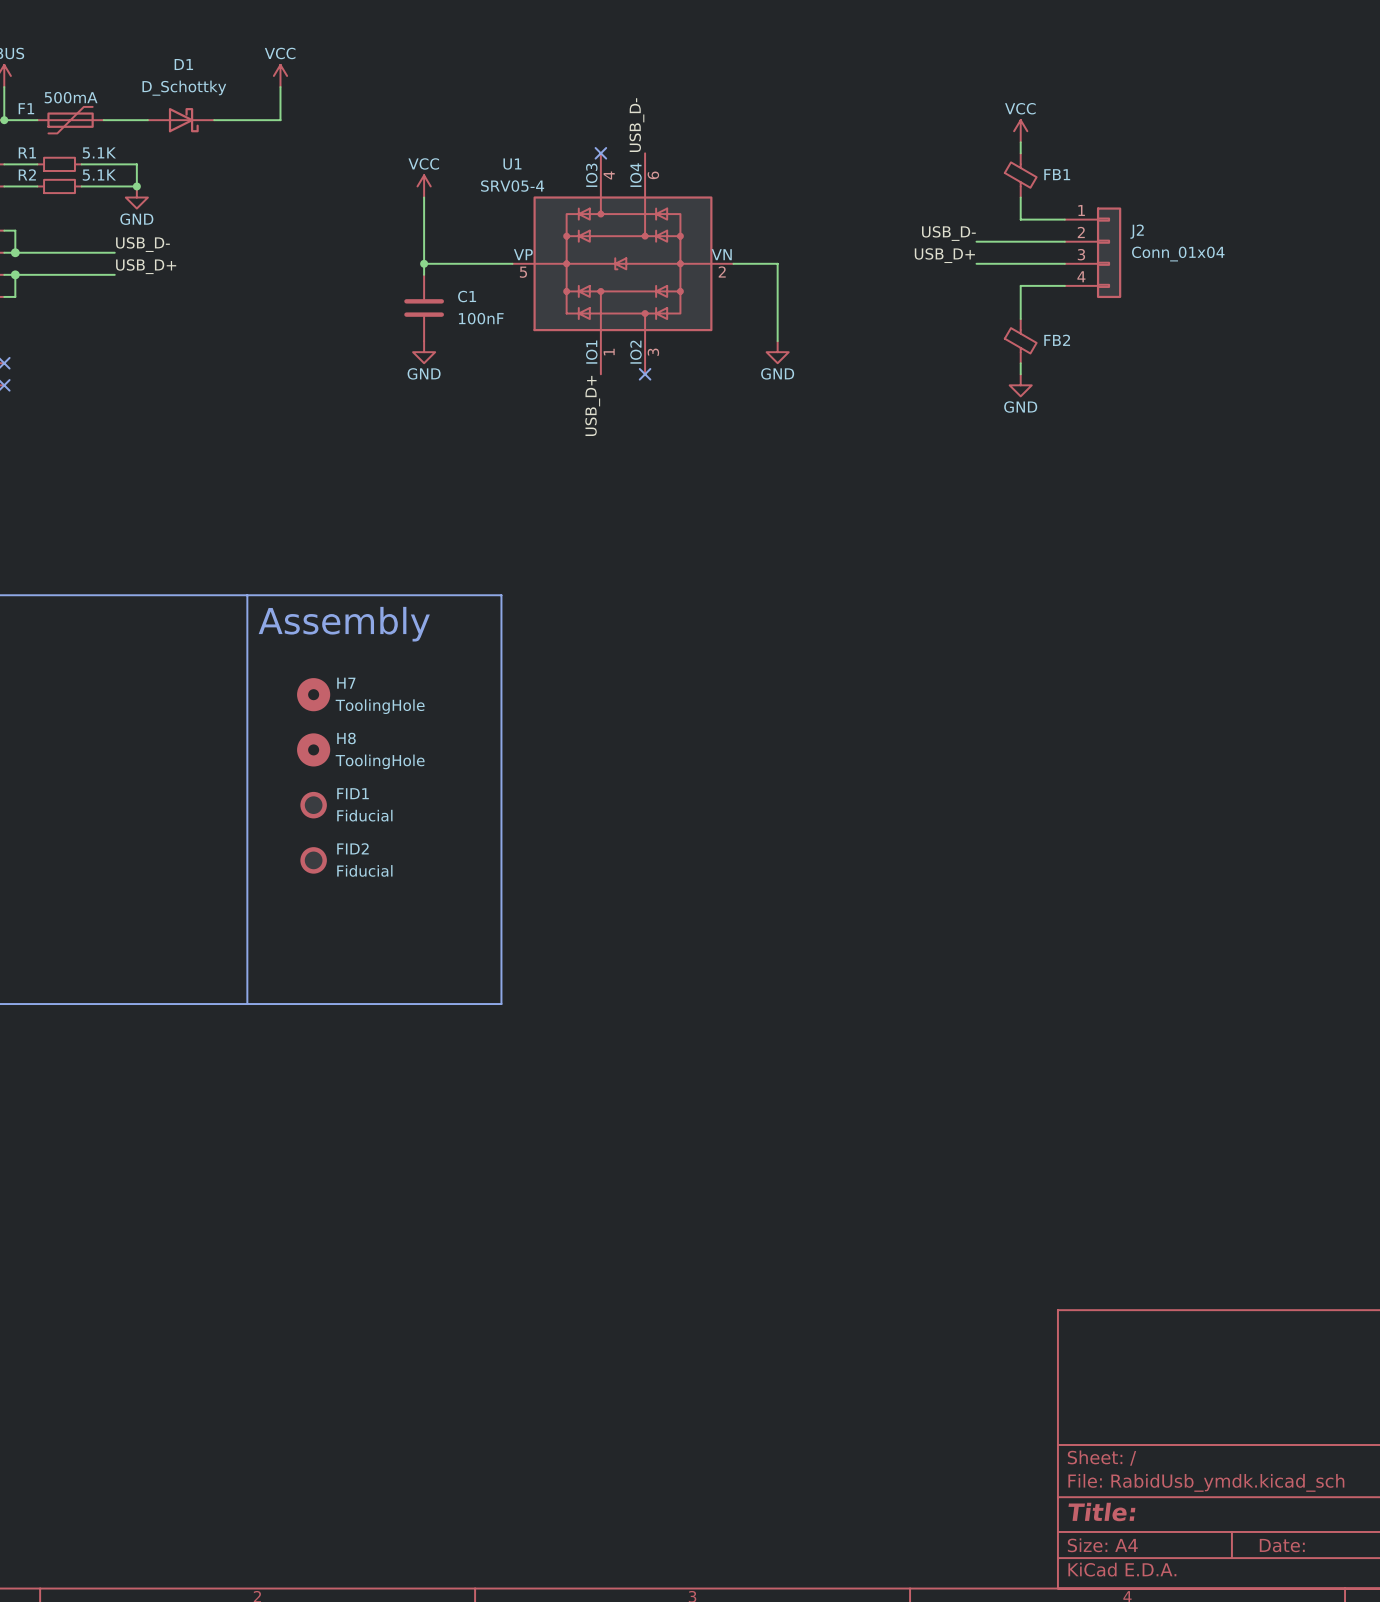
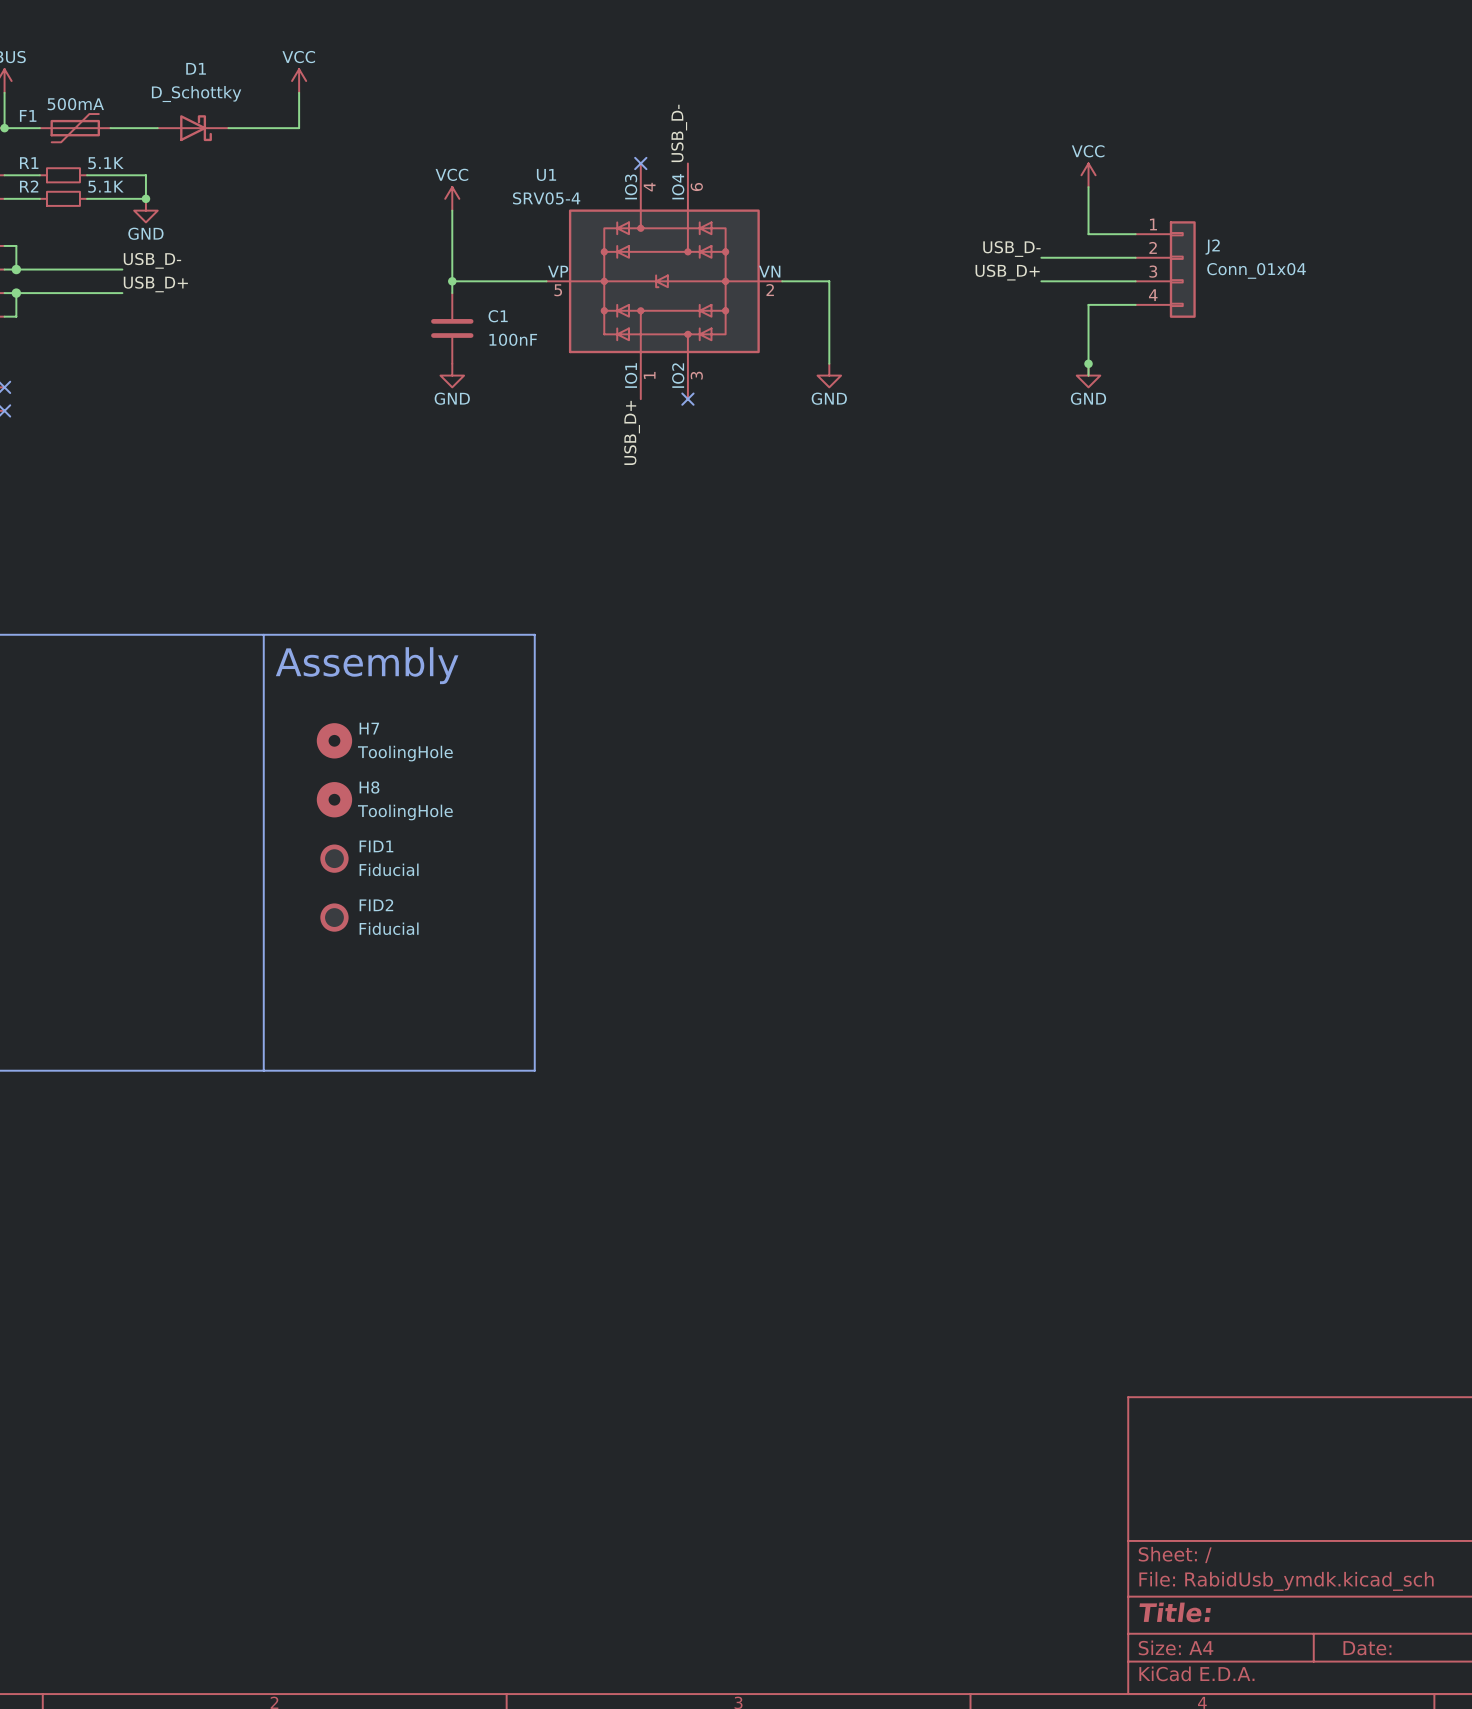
power symbol position: VCC (1020, 131) -> VCC (1088, 175)
wire: (1020, 142) (1020, 153) -> none
FB1: (1020, 175) -> none
FB2: (1020, 341) -> none
junction: none -> (1088, 363)
wire: (1020, 363) (1020, 374) -> none
power symbol position: GND (1020, 385) -> GND (1088, 375)

